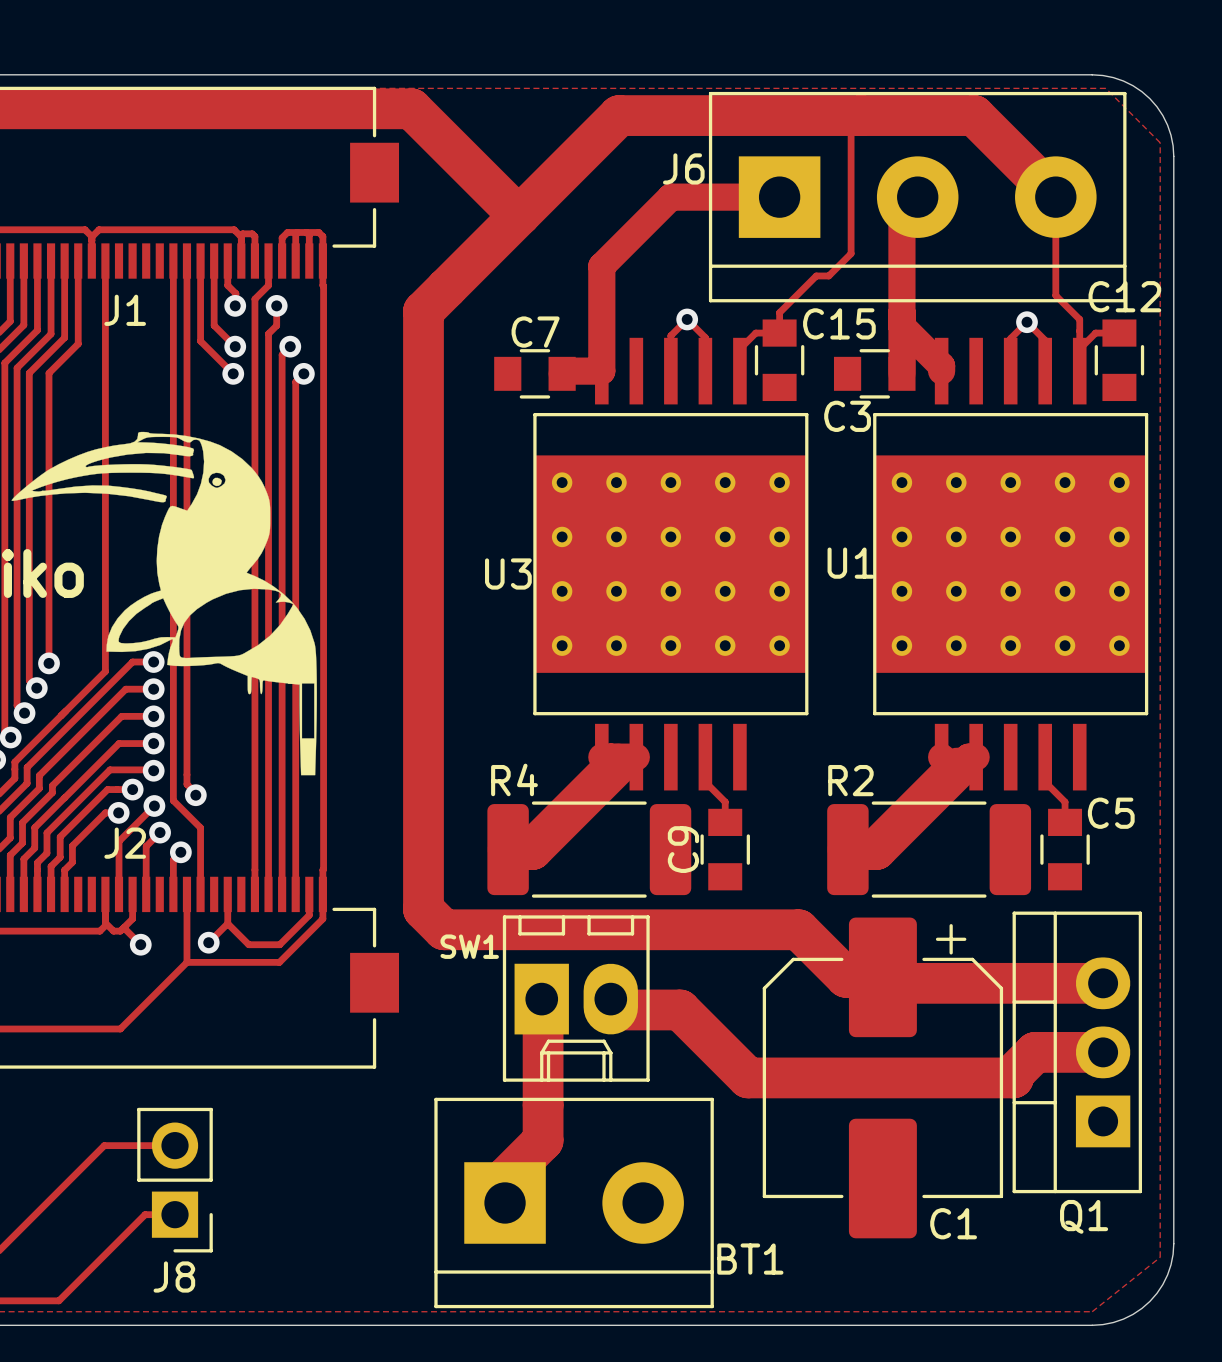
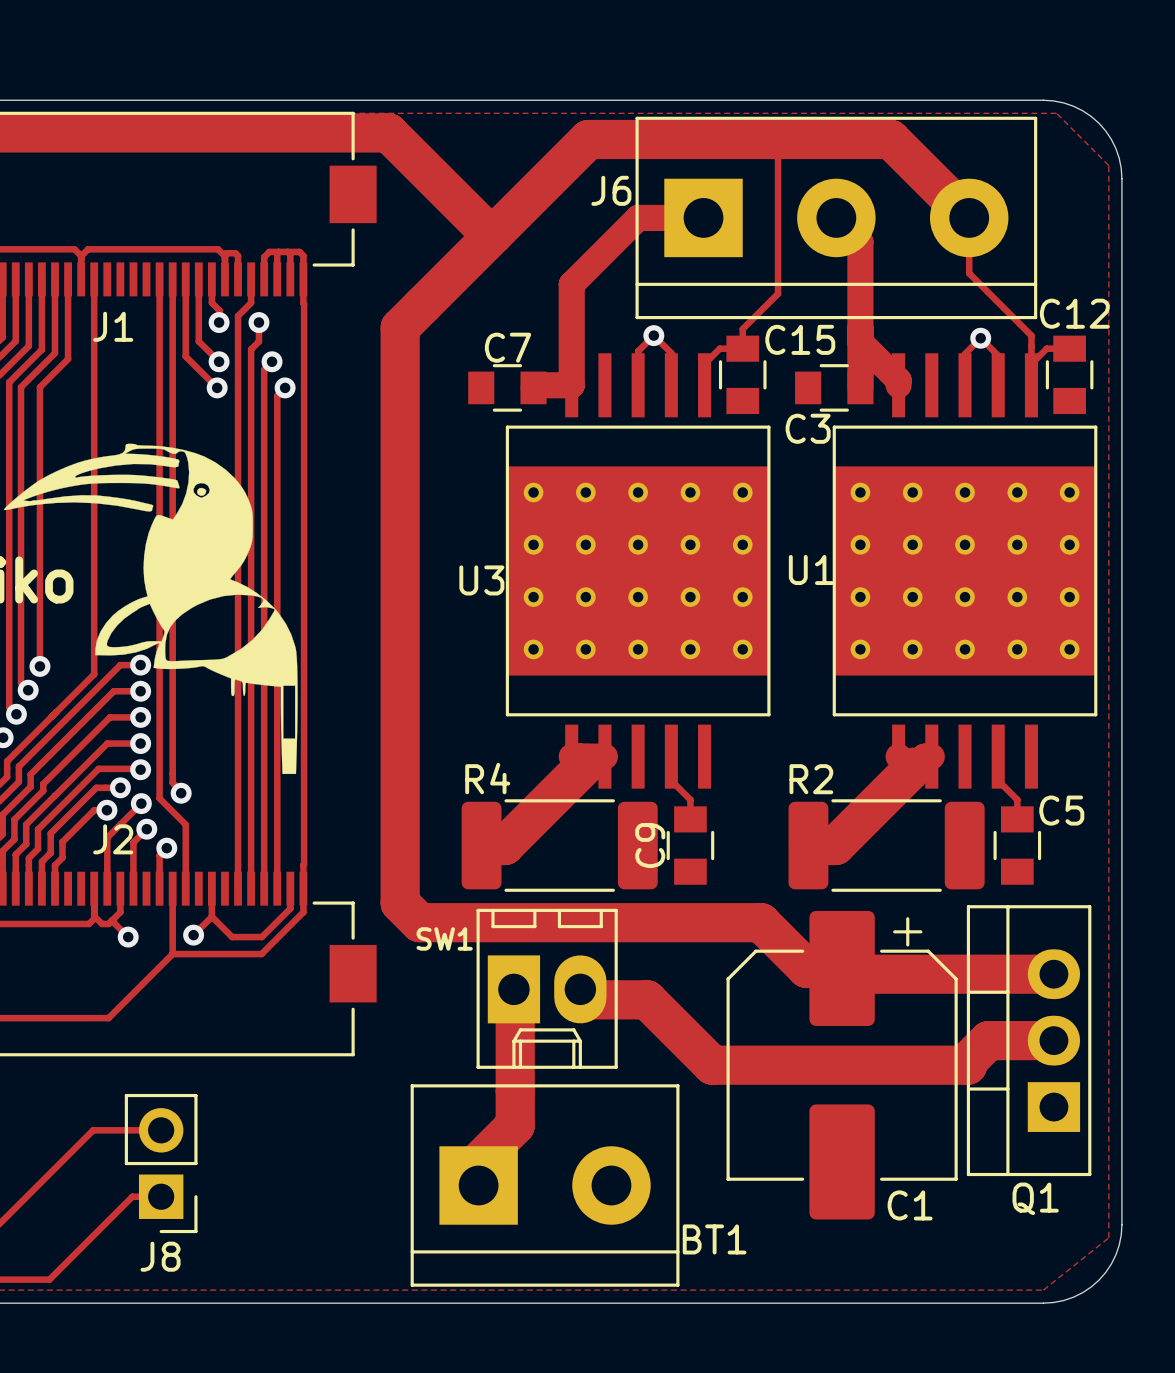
track: (861, 115) (851, 125) (851, 253) (828, 275) (816, 275) -> (778, 157) (778, 293)
track: (933, 115) (974, 115) (1055, 197) (1055, 295) -> (890, 139) (969, 217) (969, 273) (1008, 312)
J6 position: (917, 197) -> (836, 217)

